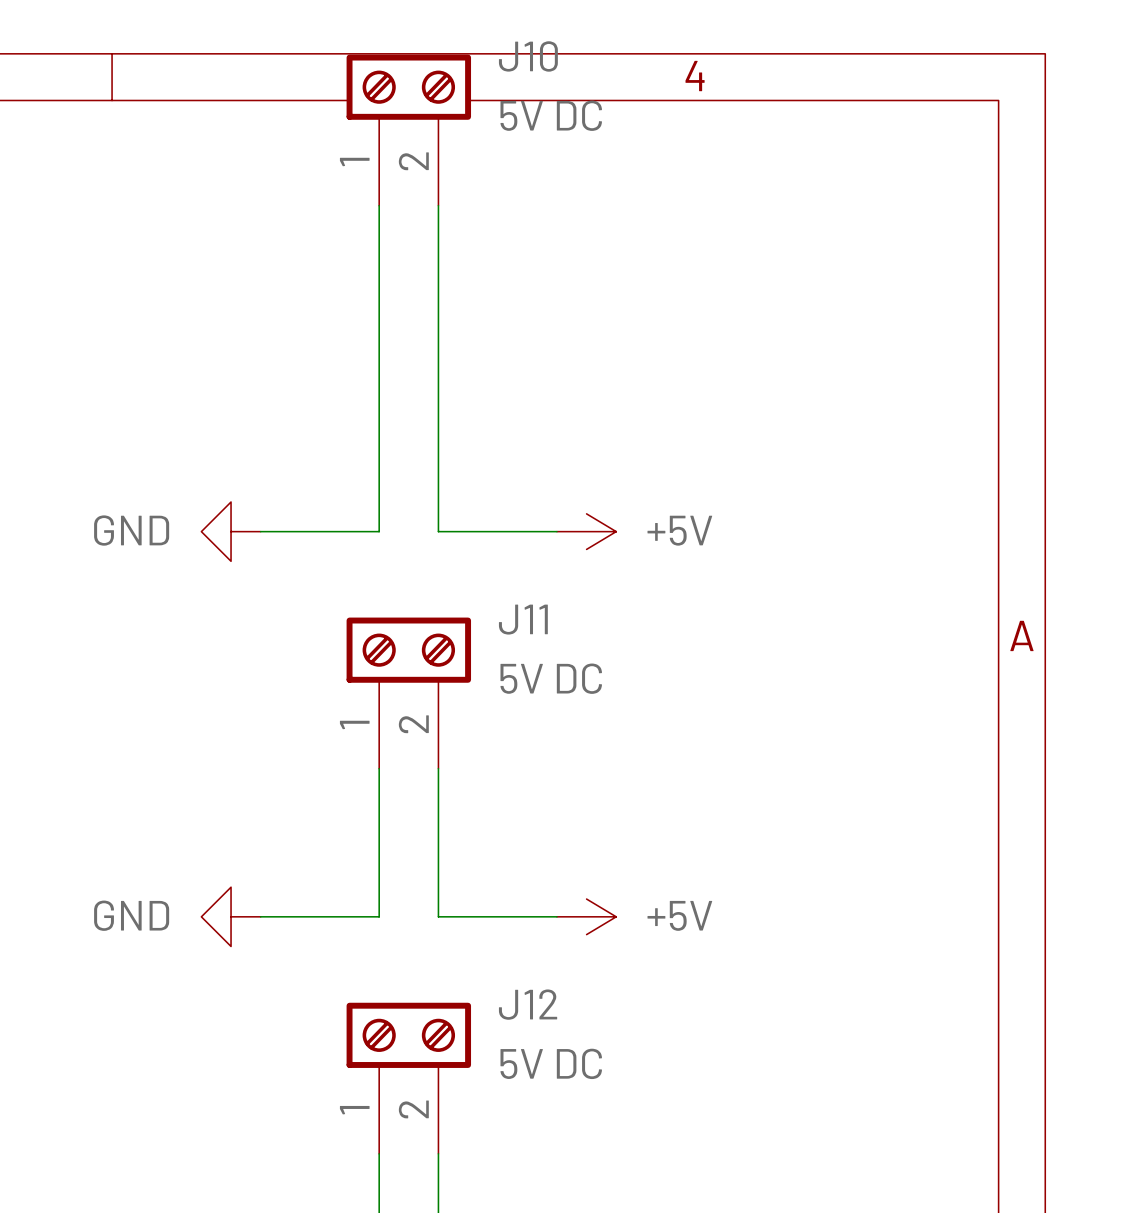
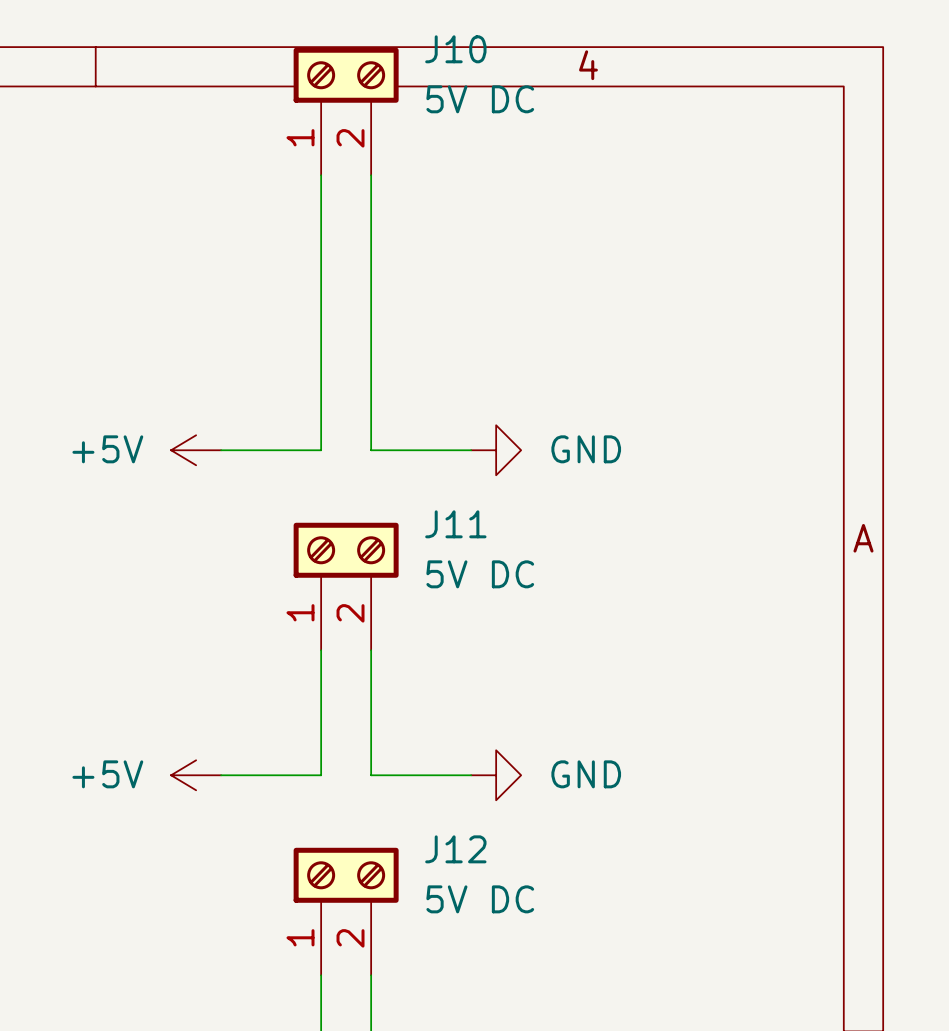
power symbol: GND (231, 531) -> +5V (196, 450)
power symbol: +5V (586, 531) -> GND (496, 450)
power symbol: GND (231, 916) -> +5V (196, 775)
power symbol: +5V (586, 916) -> GND (496, 775)

